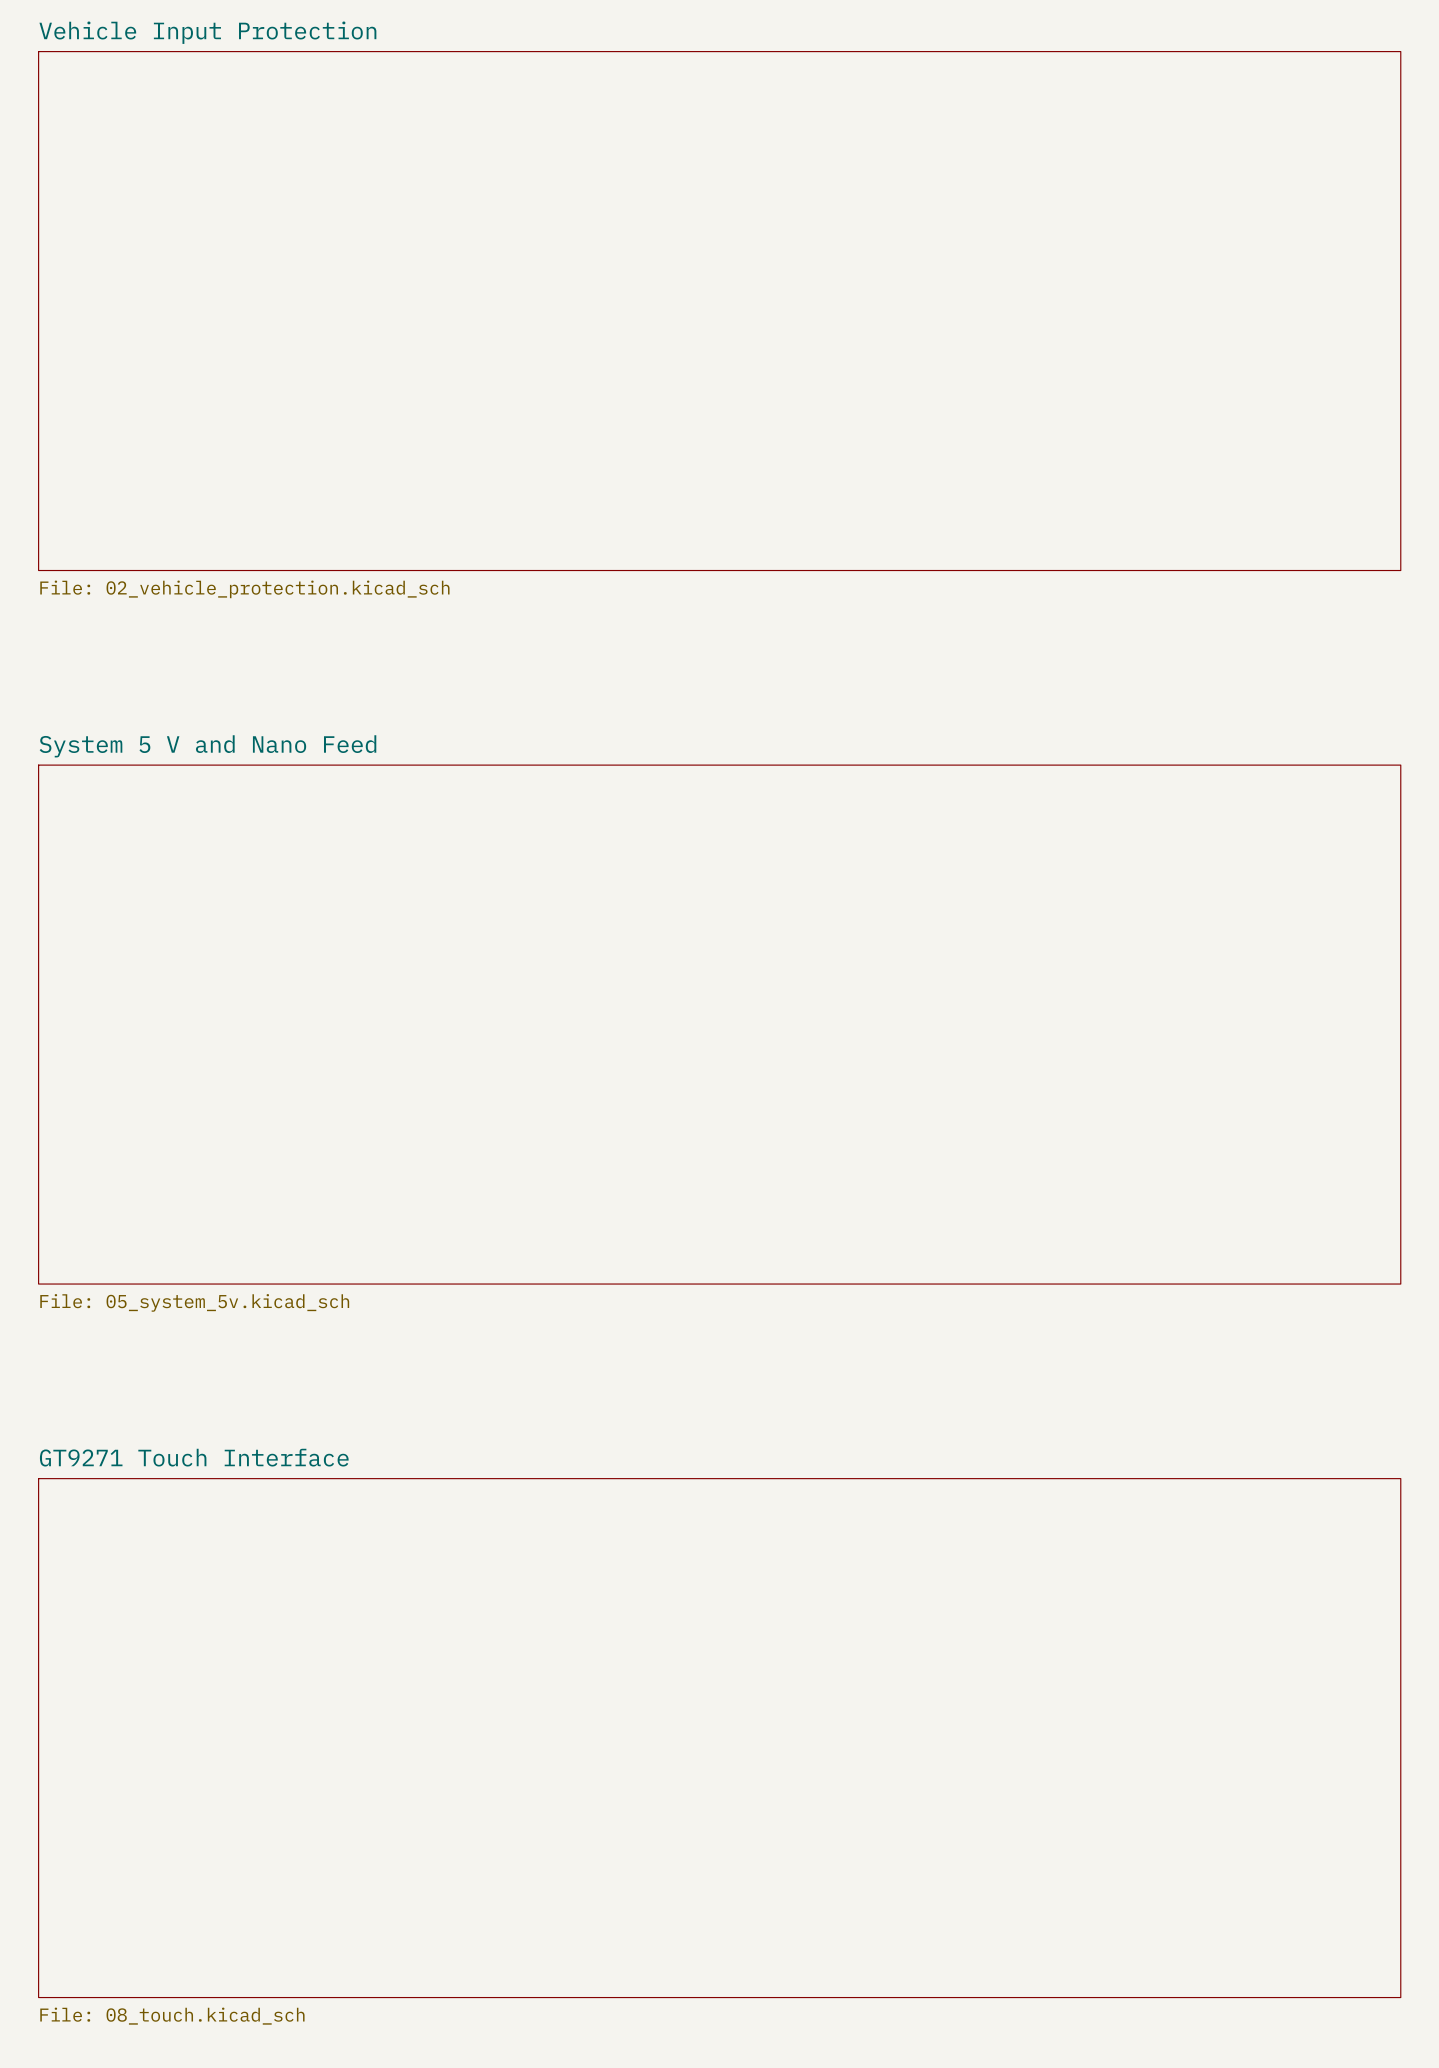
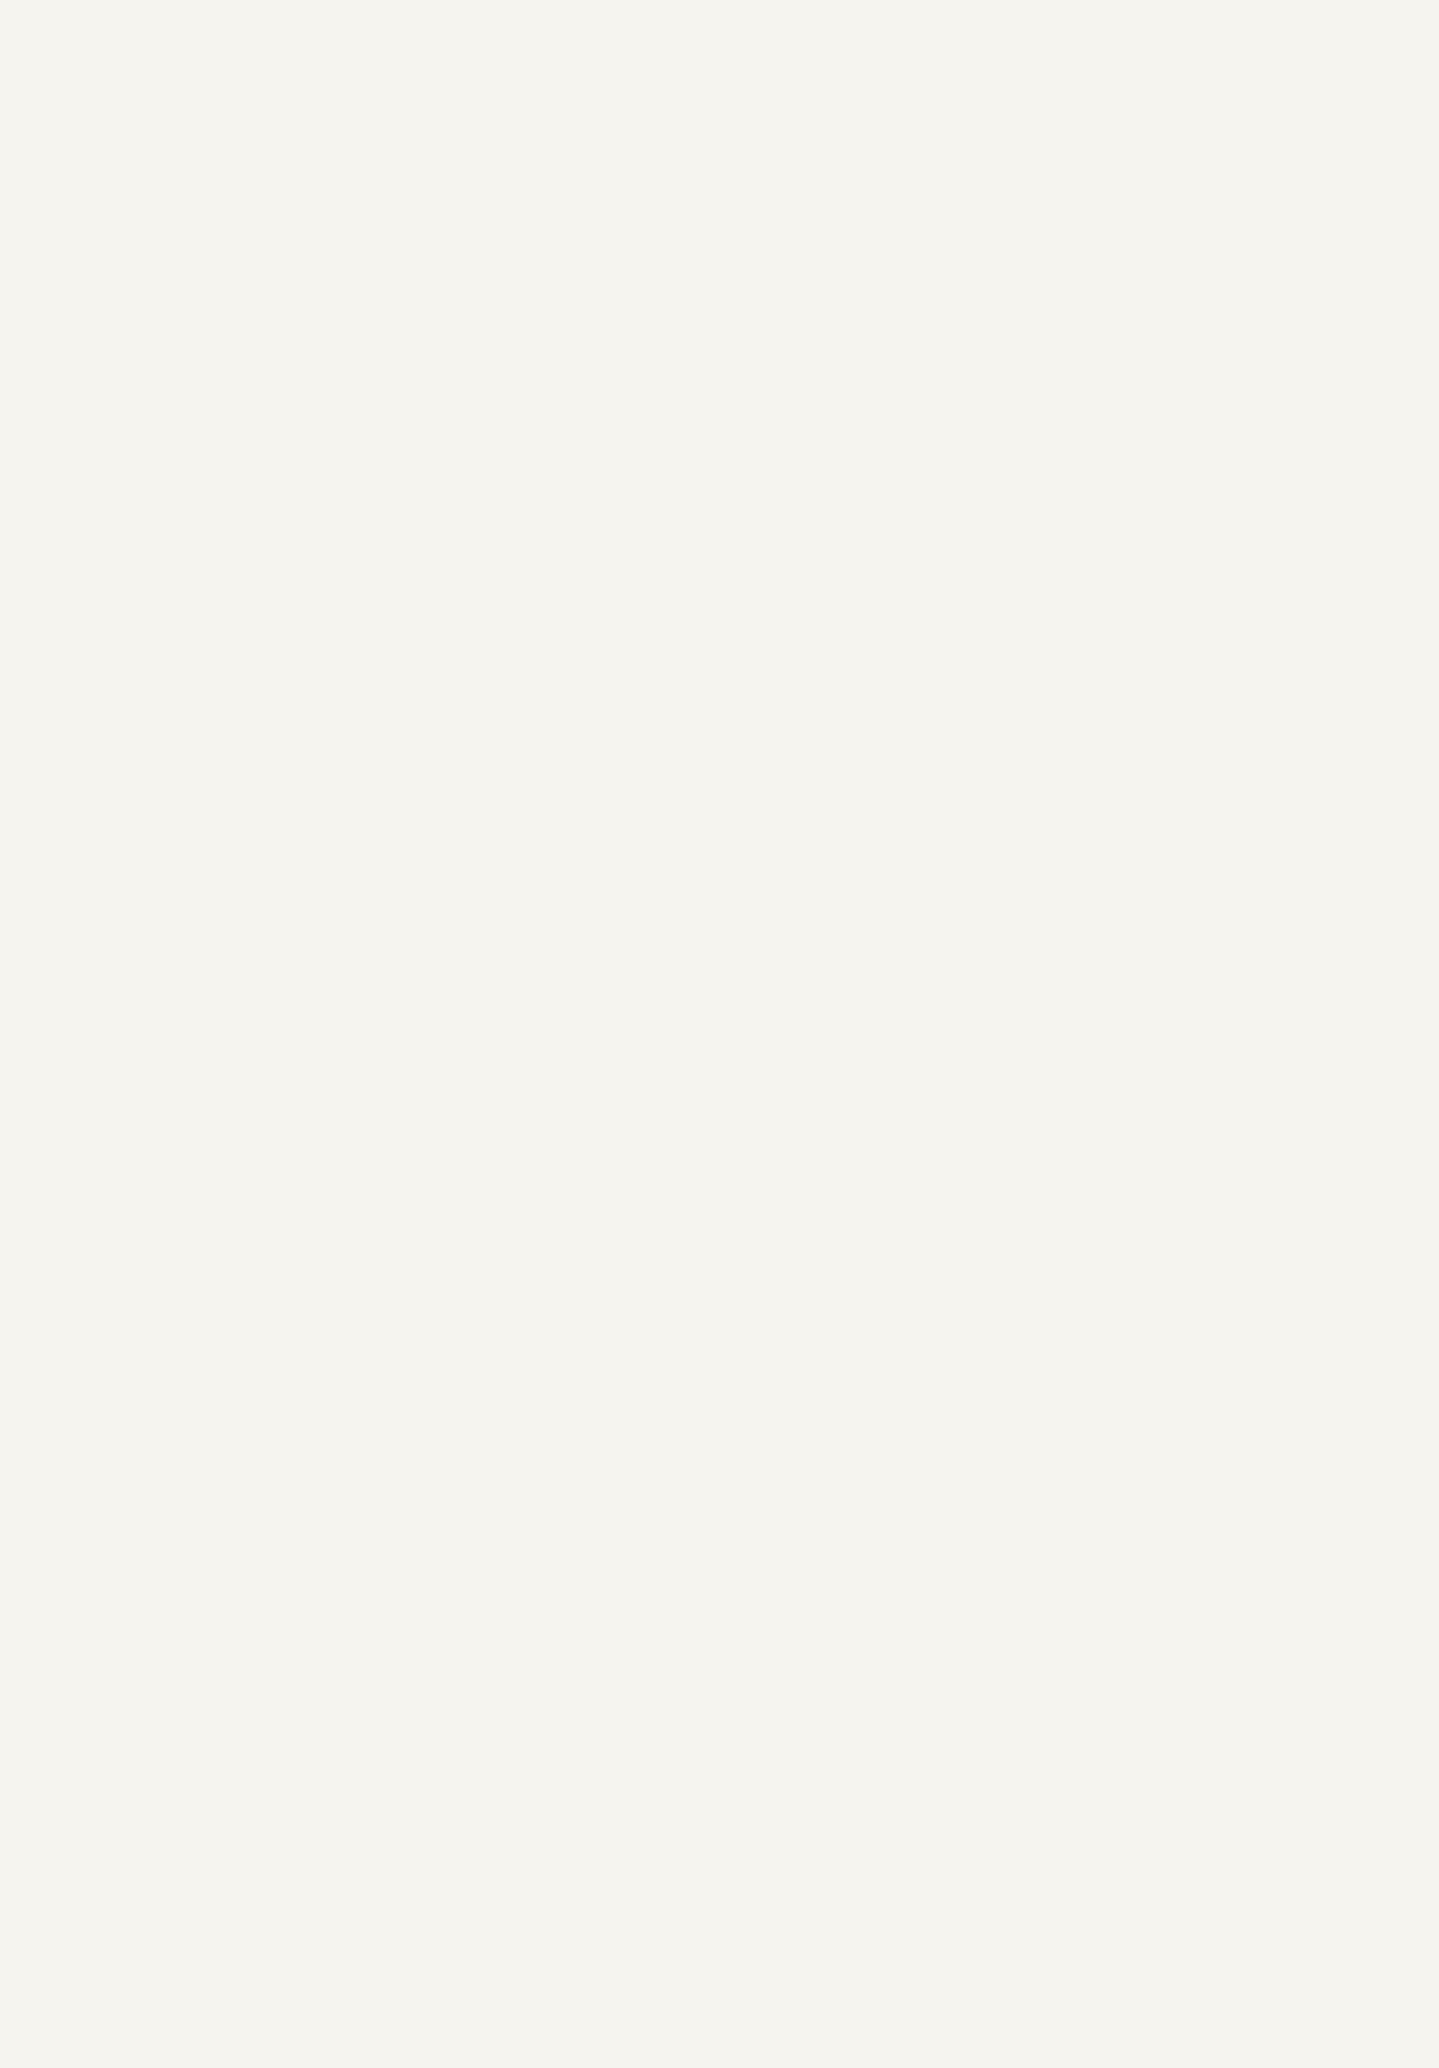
sheet Vehicle Input Protection: File: 02_vehicle_protection.kicad_sch (719, 311) -> none
sheet System 5 V and Nano Feed: File: 05_system_5v.kicad_sch (719, 1024) -> none
sheet GT9271 Touch Interface: File: 08_touch.kicad_sch (719, 1738) -> none

